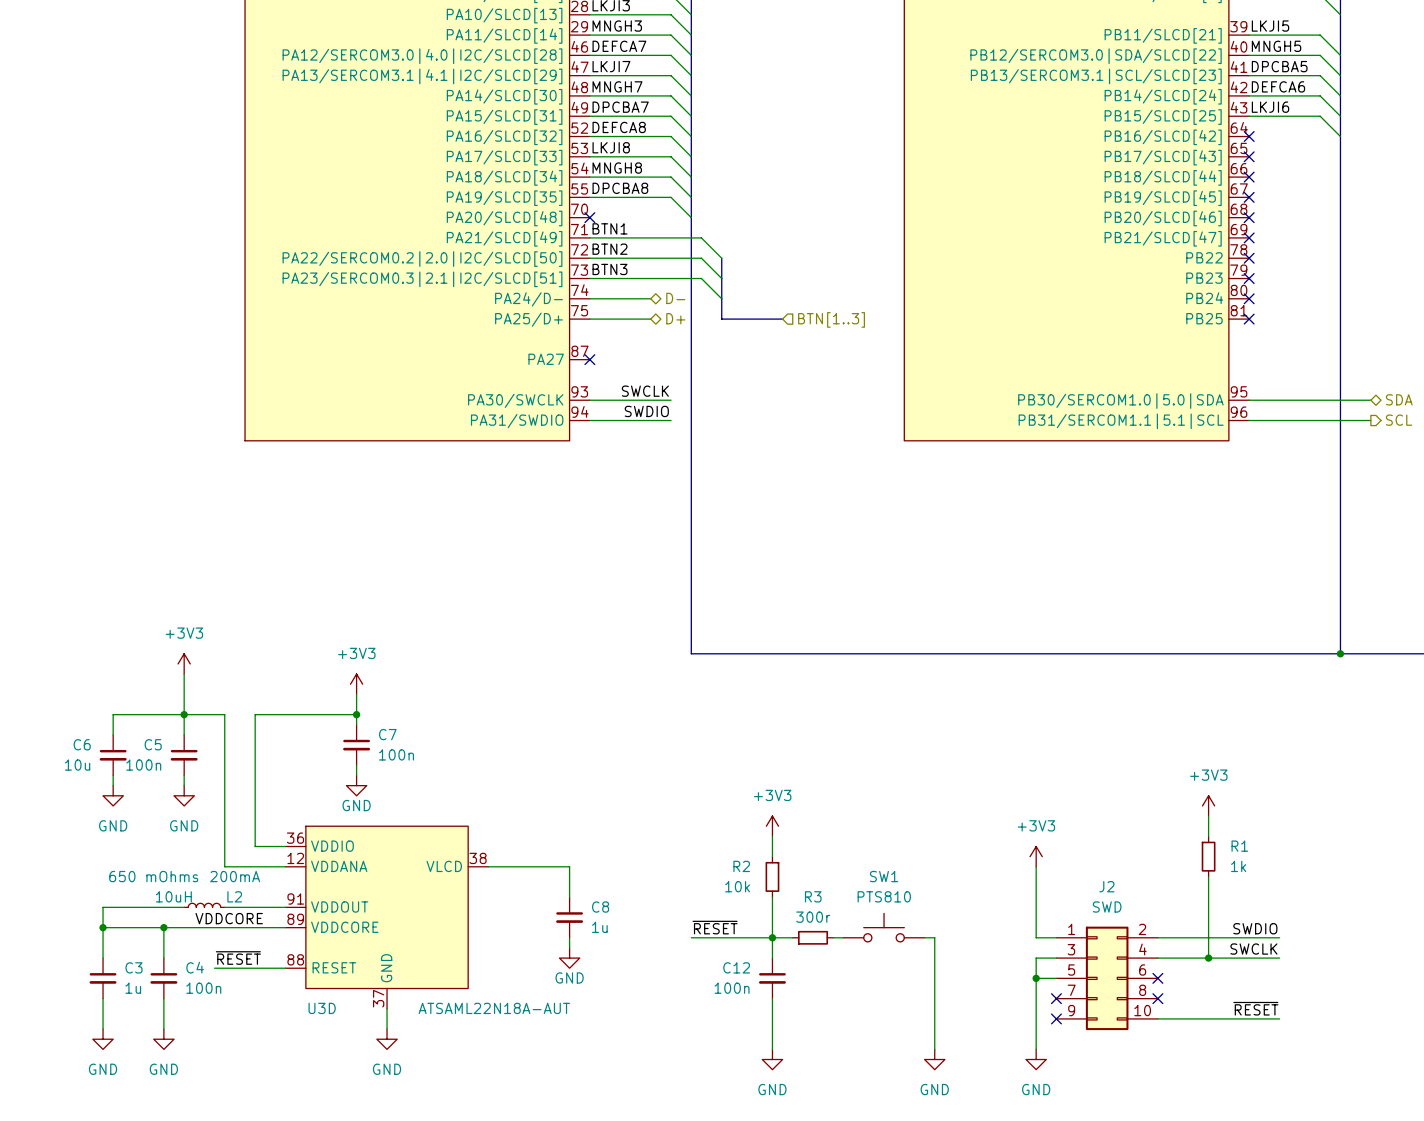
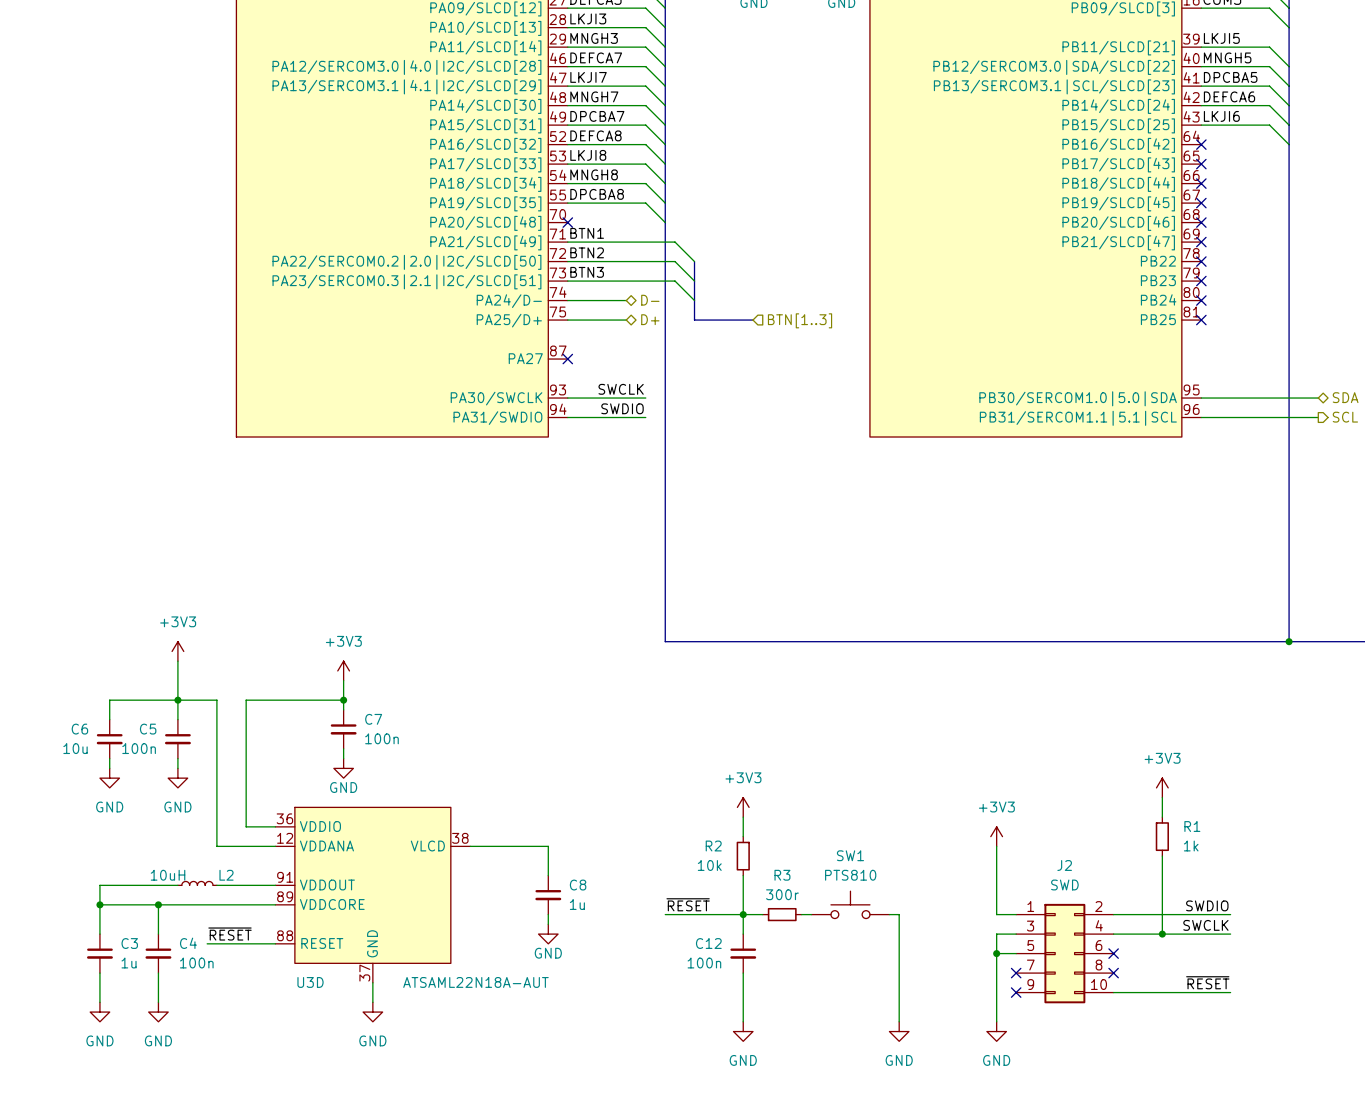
L2 text: 650 mOhms (153, 876) -> none
L2 text: 200mA (235, 876) -> none
label: VDDCORE (229, 918) -> none

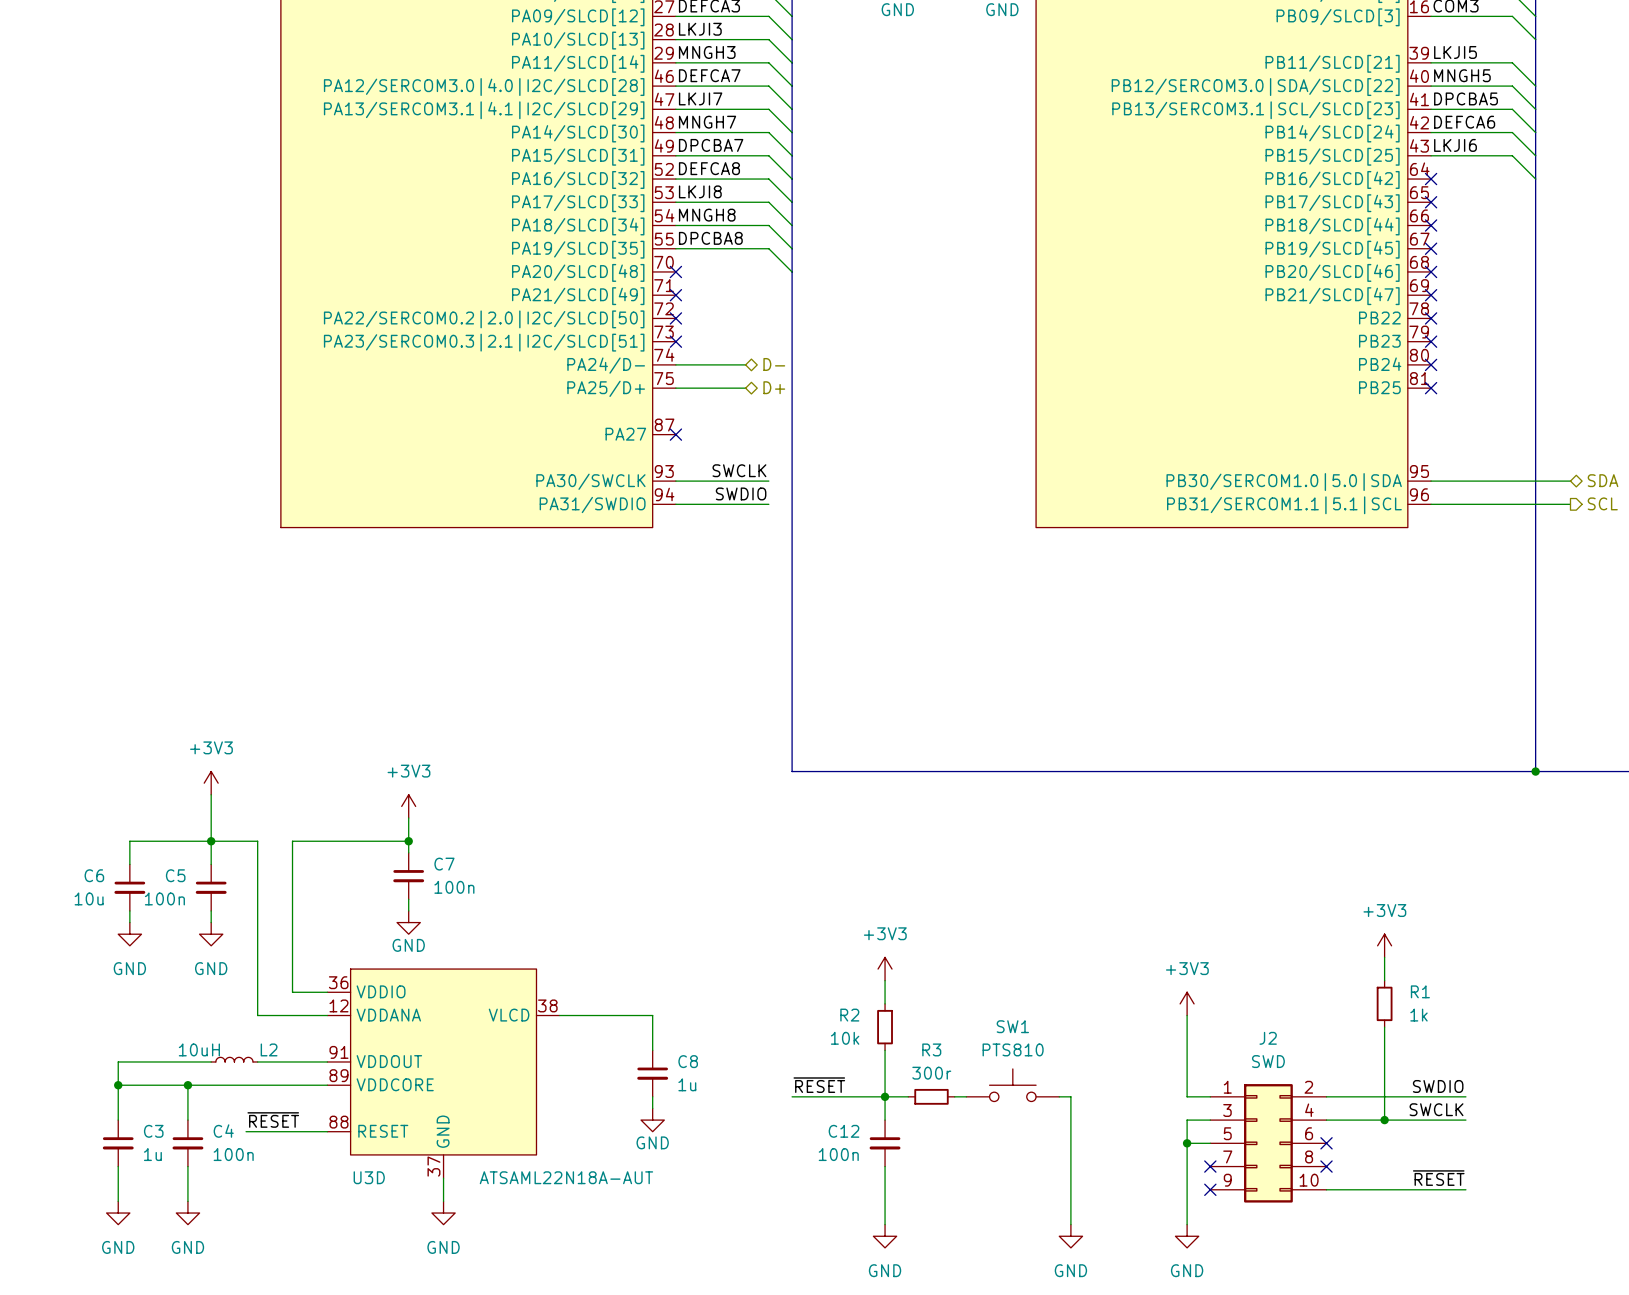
label: BTN1 (587, 233) -> none
wire: (567, 242) (675, 242) (694, 261) -> none
no-connect mark: none -> (675, 295)
label: BTN2 (587, 252) -> none
wire: (567, 261) (675, 261) (694, 281) -> none
no-connect mark: none -> (675, 318)
bus: (694, 261) (694, 320) (752, 320) -> none
label: BTN3 (587, 272) -> none
wire: (567, 281) (675, 281) (694, 300) -> none
no-connect mark: none -> (675, 341)
hierarchical label: BTN[1..3] (800, 320) -> none

